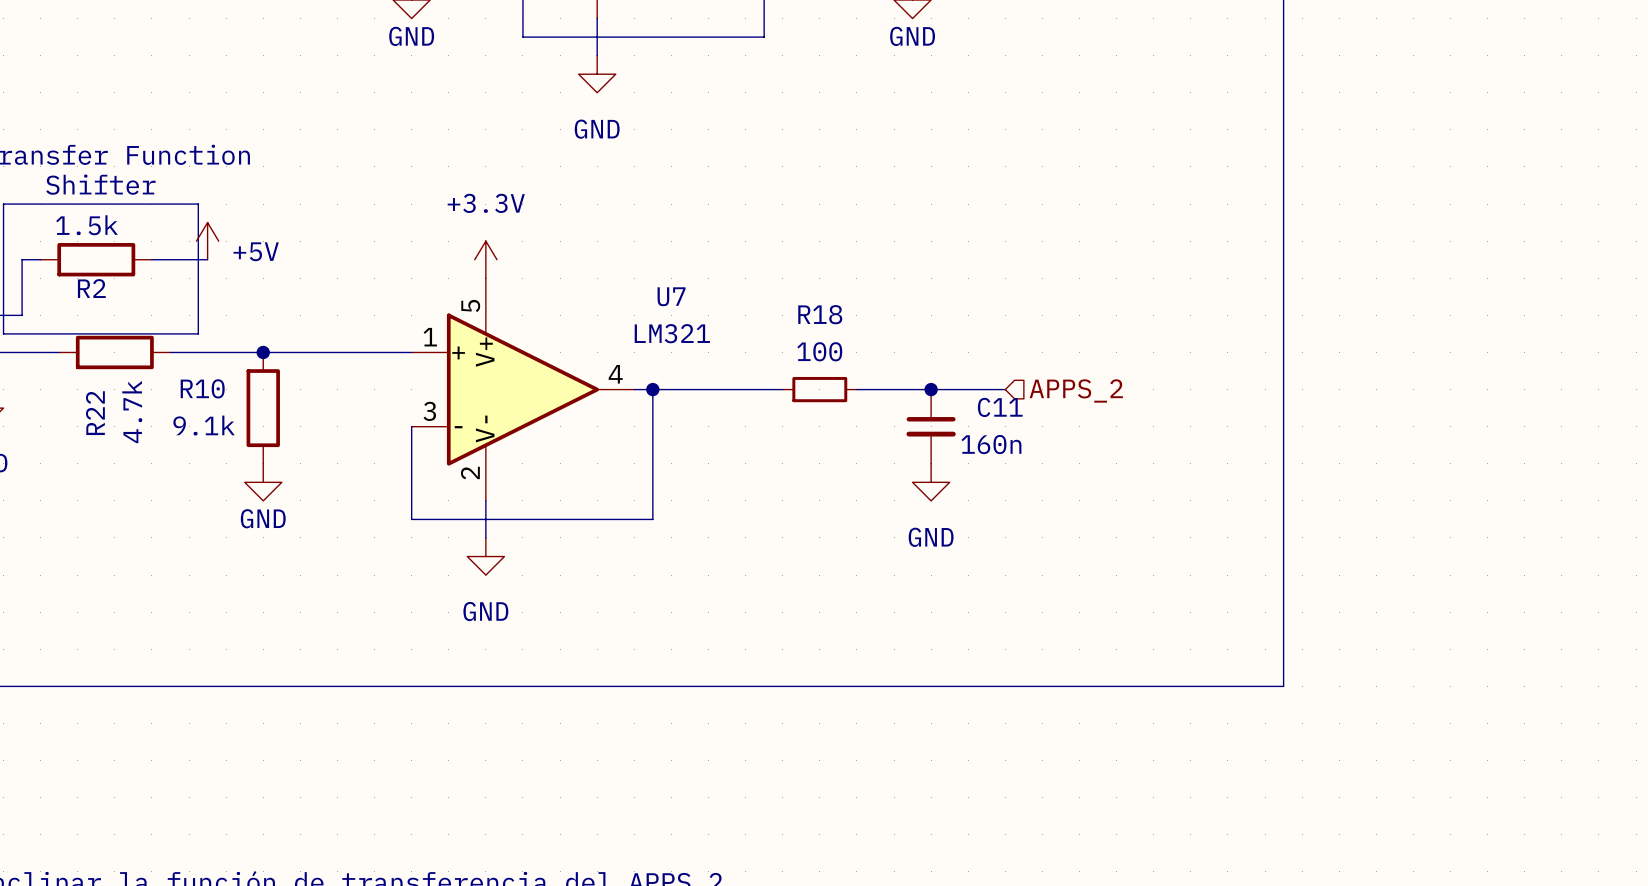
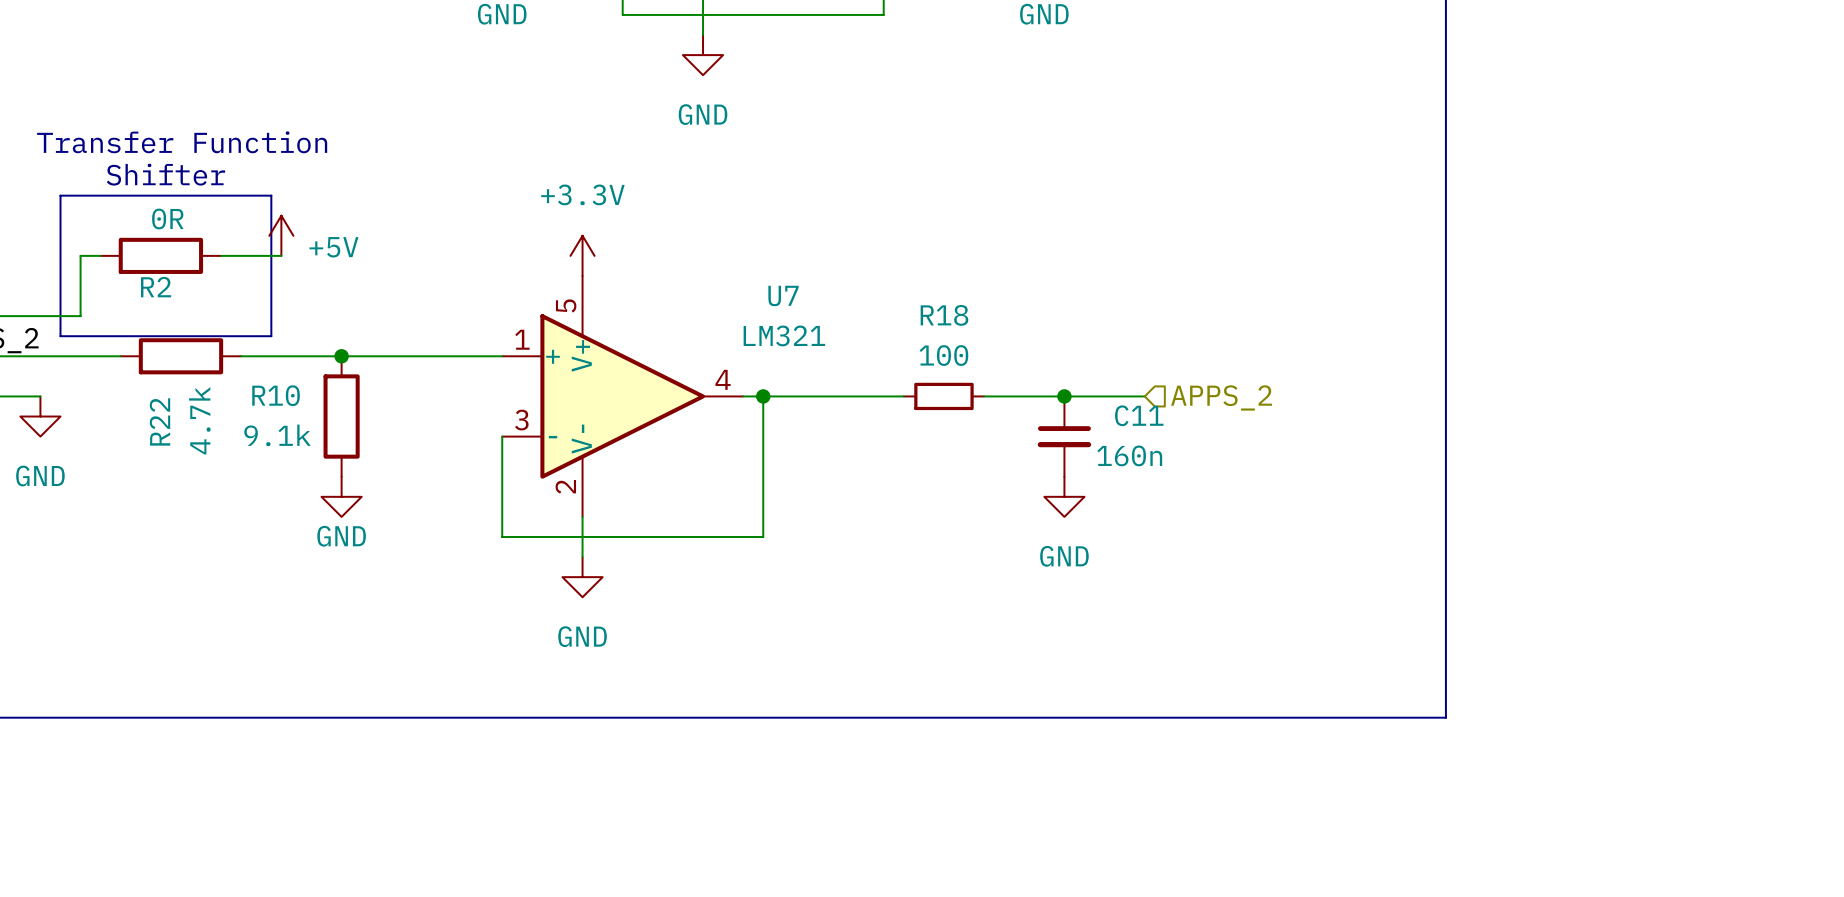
R2 value: 1.5k (87, 225) -> 0R (167, 219)

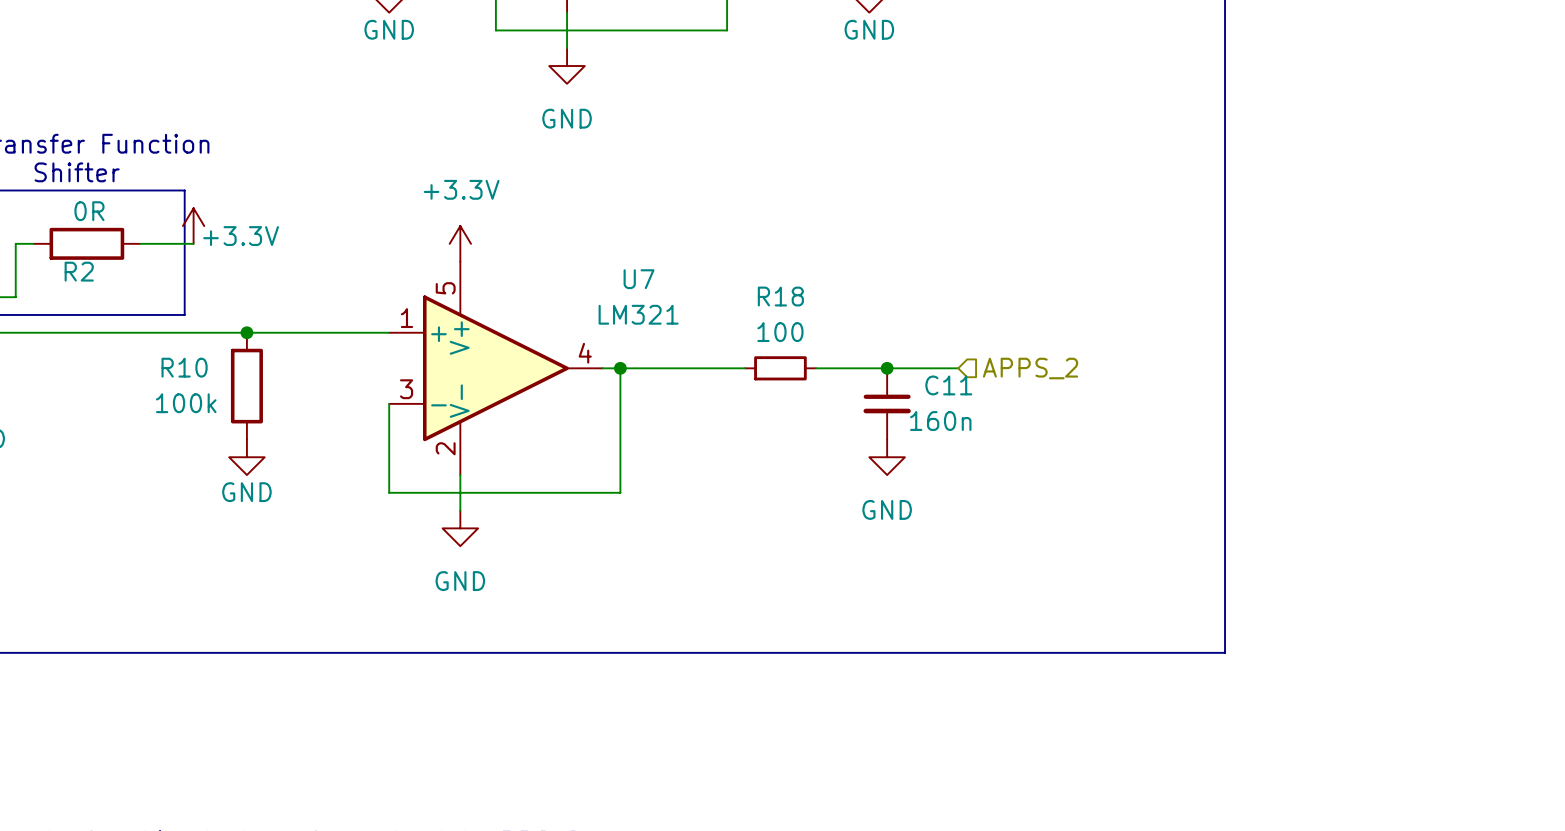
power symbol: +5V (281, 235) -> +3.3V (193, 226)
wire: none -> (51, 332) (158, 332)
R22: 4.7k (180, 356) -> none
R10 value: 9.1k (277, 435) -> 100k (186, 403)

